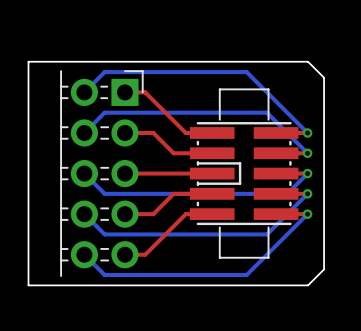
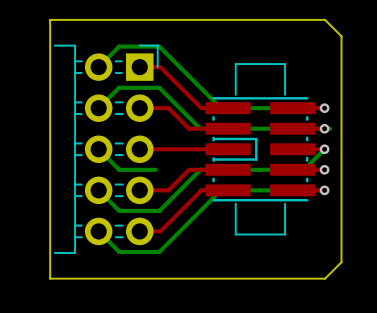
board edge: (28, 61) (308, 61) (324, 77) (324, 269) (308, 285) (28, 285) (28, 61) -> (50, 19) (50, 278) (325, 278) (341, 262) (341, 36) (325, 19) (50, 19)
part footprint: [60, 70, 144, 277] -> [53, 44, 159, 254]
bottom track: (144, 72) (246, 72) (307, 132) -> (159, 46) (220, 108) (324, 108)
bottom track: (104, 112) (267, 112) (307, 153) -> (119, 87) (159, 87) (200, 128) (329, 128)
line: (219, 119) (219, 89) (268, 89) (268, 119) -> none
part footprint: [189, 122, 299, 226] -> [205, 63, 316, 236]
bottom track: (140, 193) (185, 193) -> (159, 210) (200, 169)
bottom track: (307, 193) (267, 234) (144, 234) -> none
bottom track: (307, 214) (246, 275) (144, 275) -> (324, 190) (220, 190) (159, 251)
line: (219, 227) (219, 257) (268, 257) (268, 227) -> none

